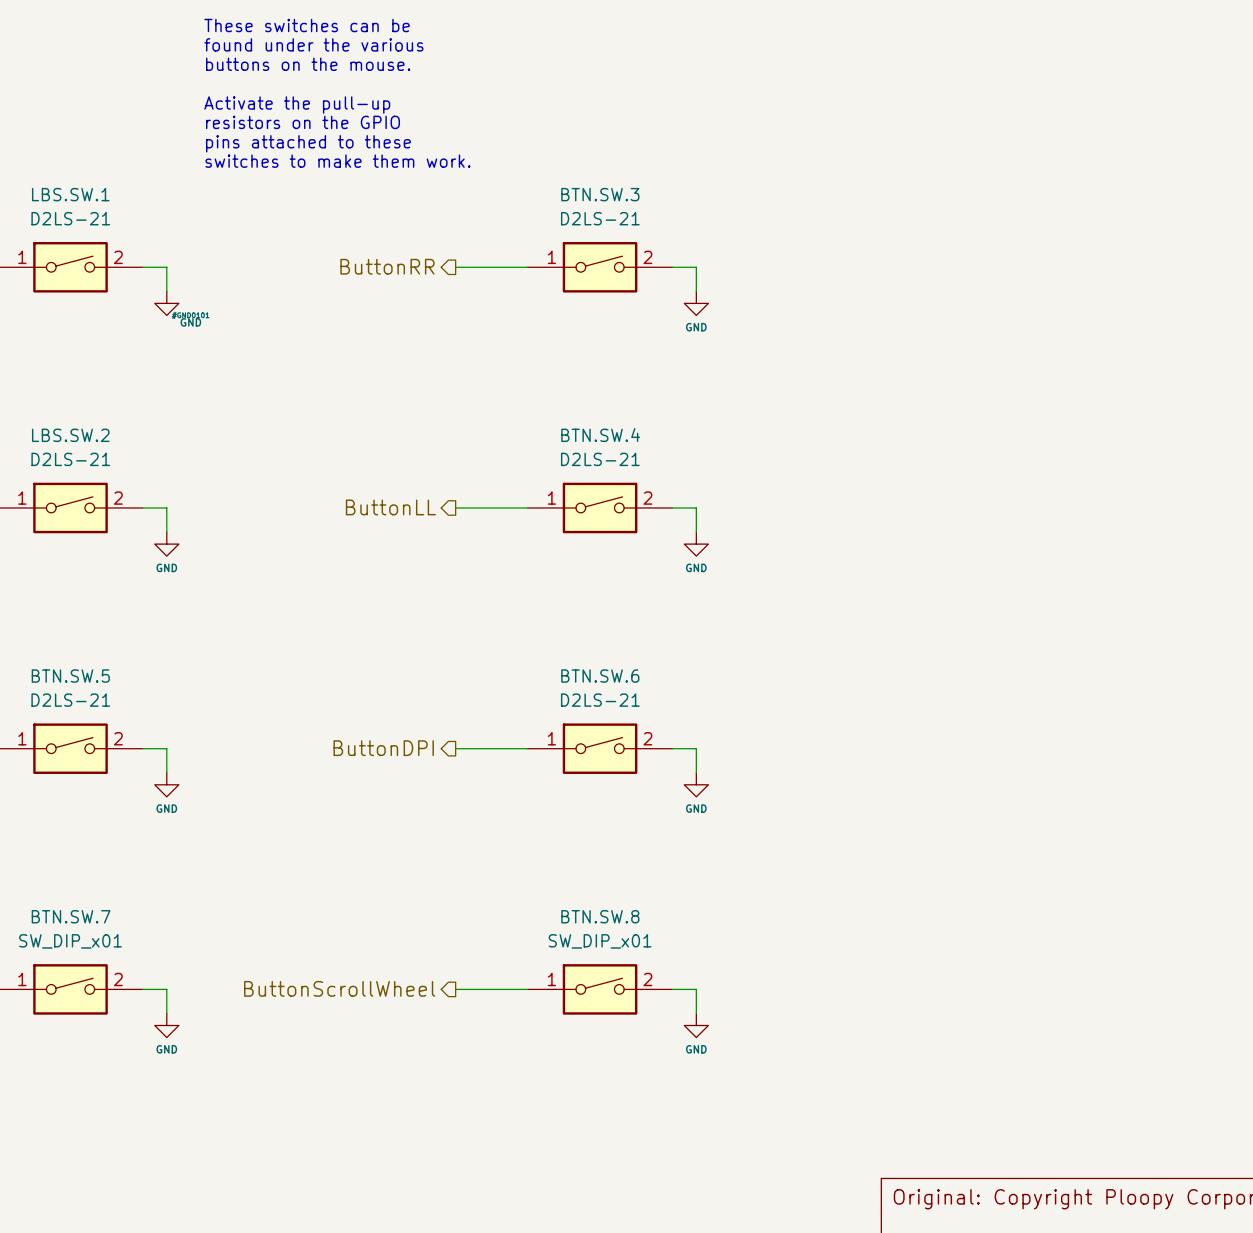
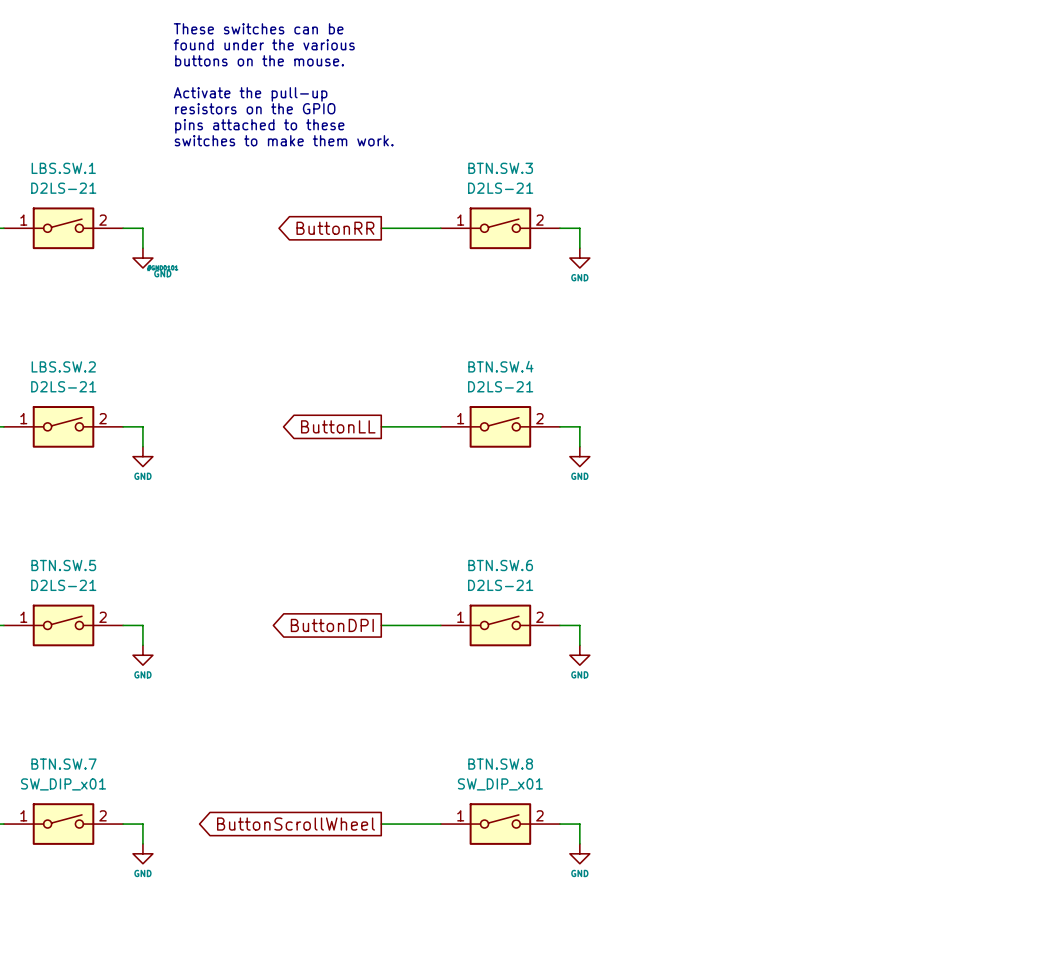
hierarchical label: ButtonRR (387, 266) -> none
global label: none -> ButtonRR (335, 228)
hierarchical label: ButtonLL (390, 507) -> none
global label: none -> ButtonLL (338, 426)
hierarchical label: ButtonDPI (383, 748) -> none
global label: none -> ButtonDPI (332, 625)
hierarchical label: ButtonScrollWheel (339, 988) -> none
global label: none -> ButtonScrollWheel (296, 824)

